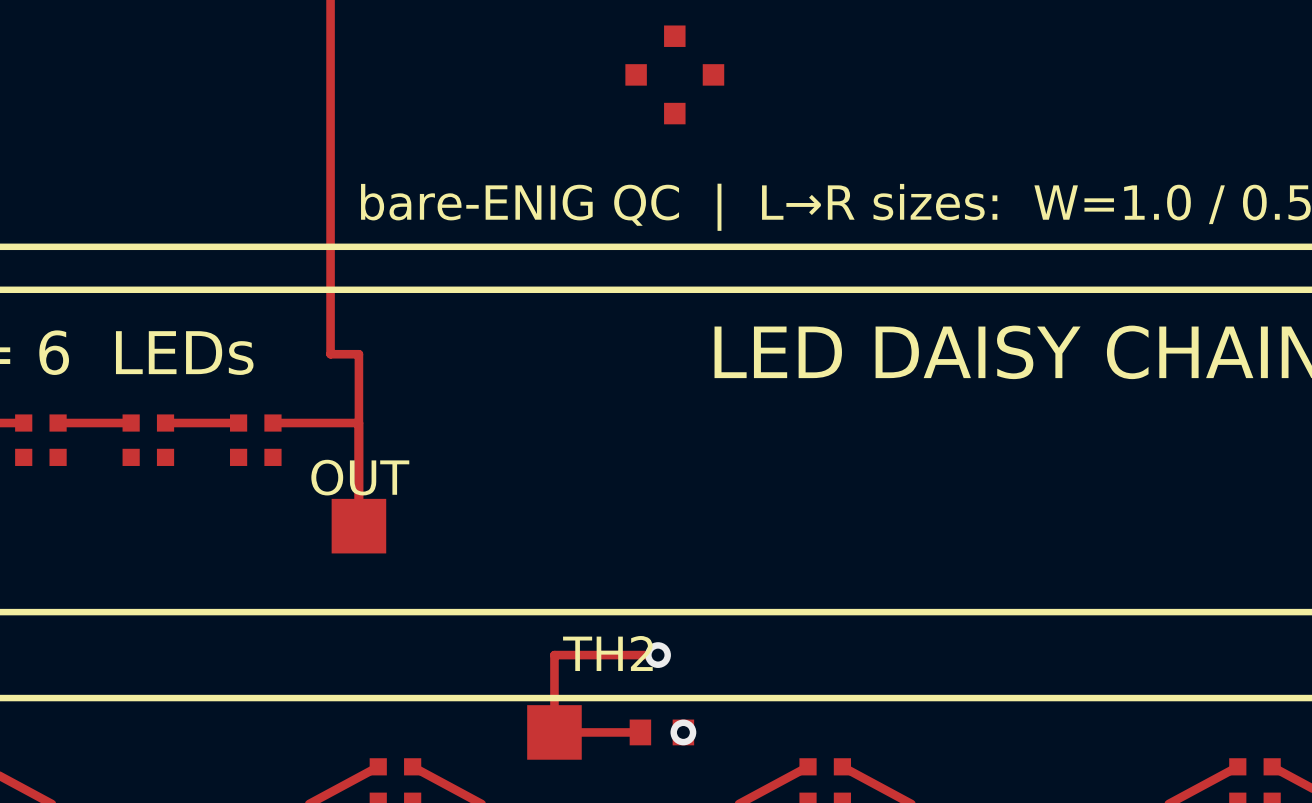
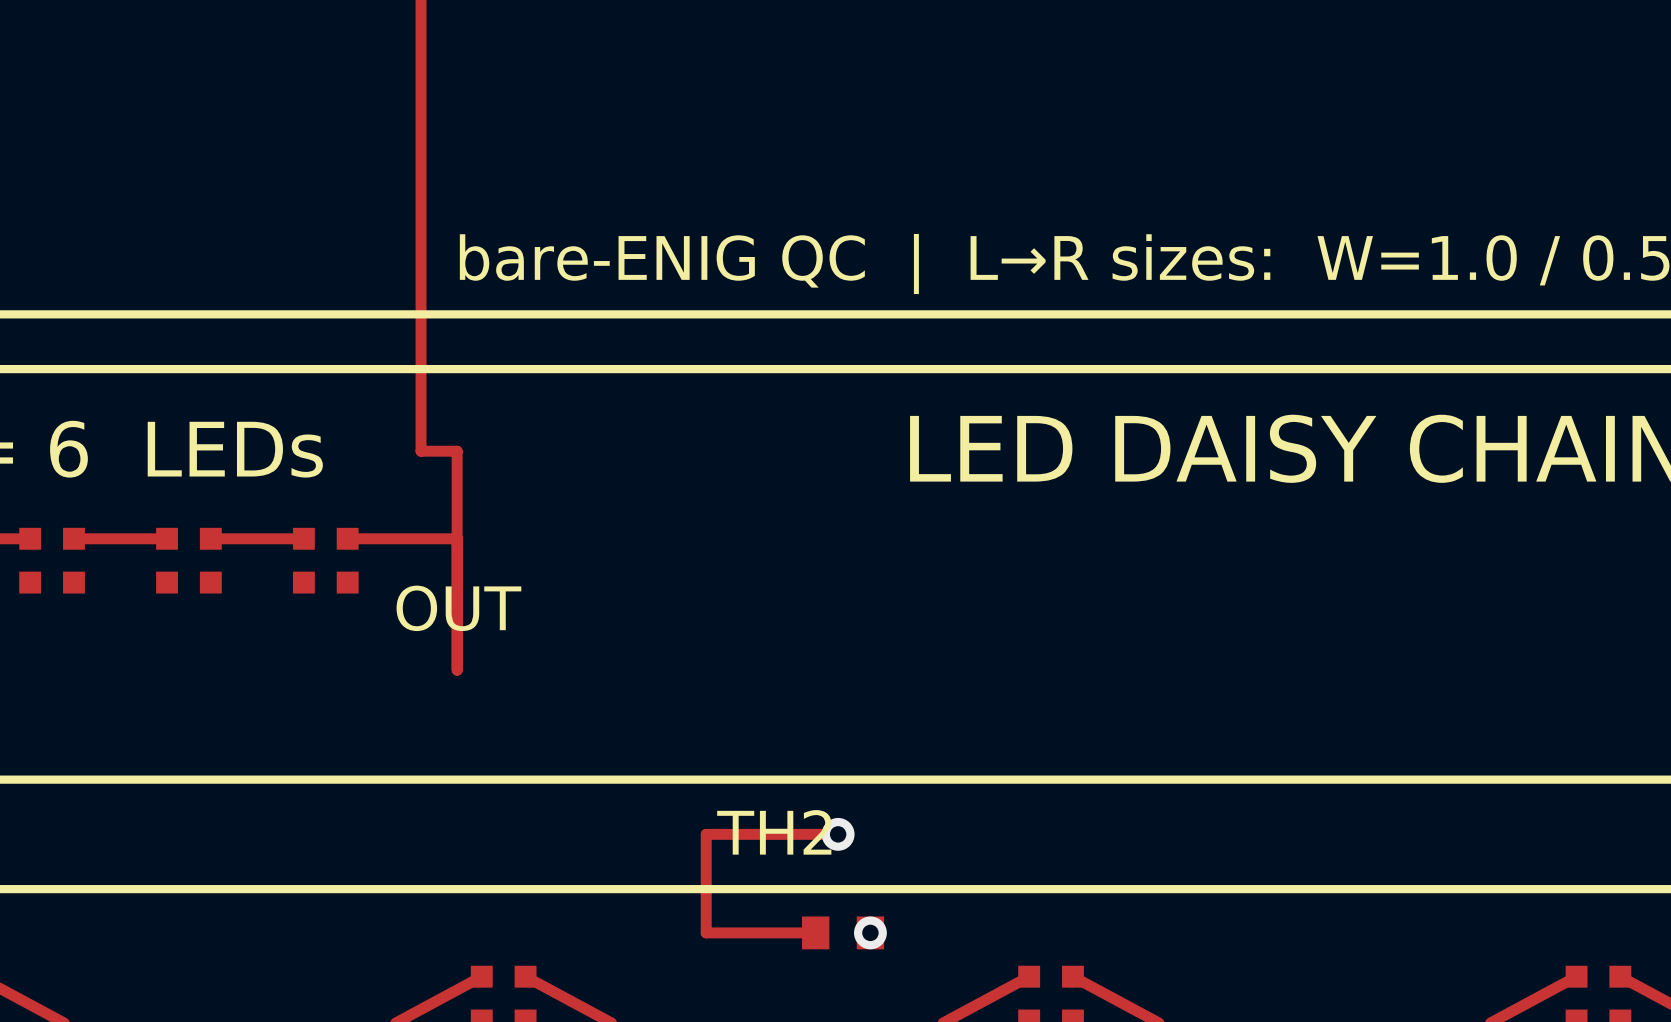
part: (674, 74) -> none
part: (358, 526) -> none
part: (554, 732) -> none

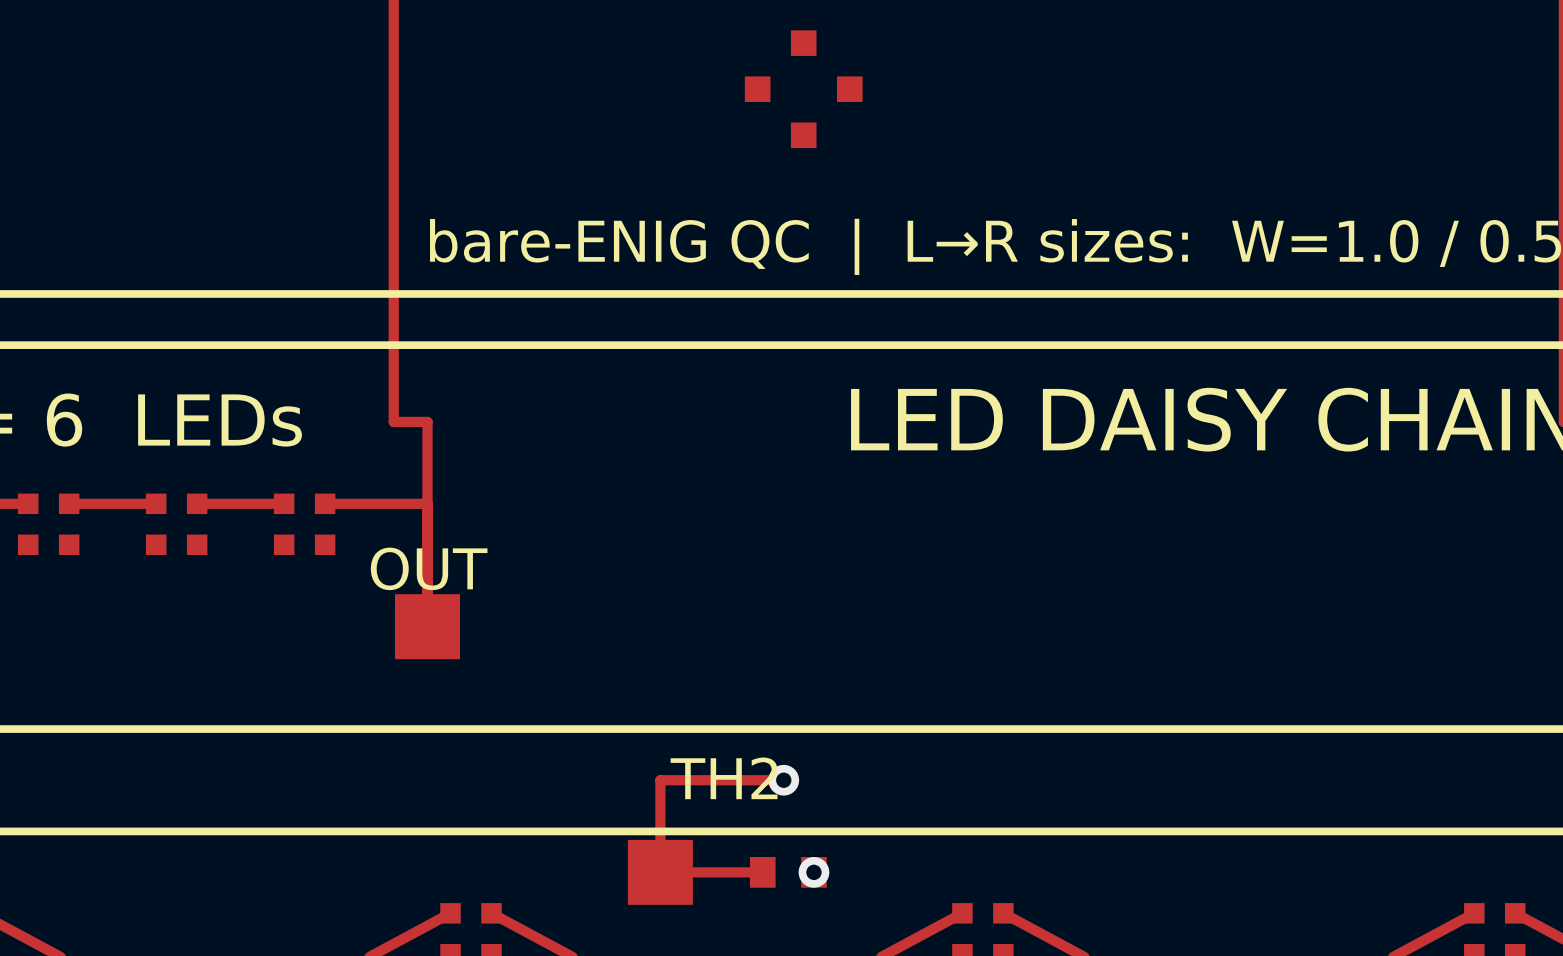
part: none -> (803, 89)
part: none -> (427, 626)
part: none -> (660, 872)

